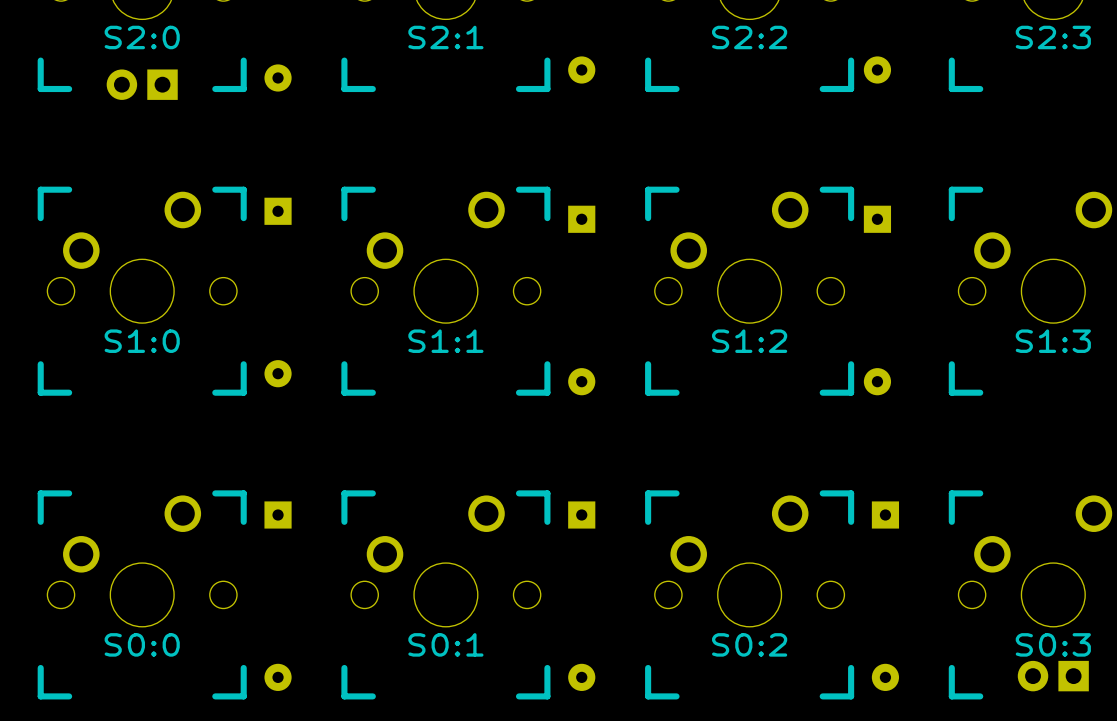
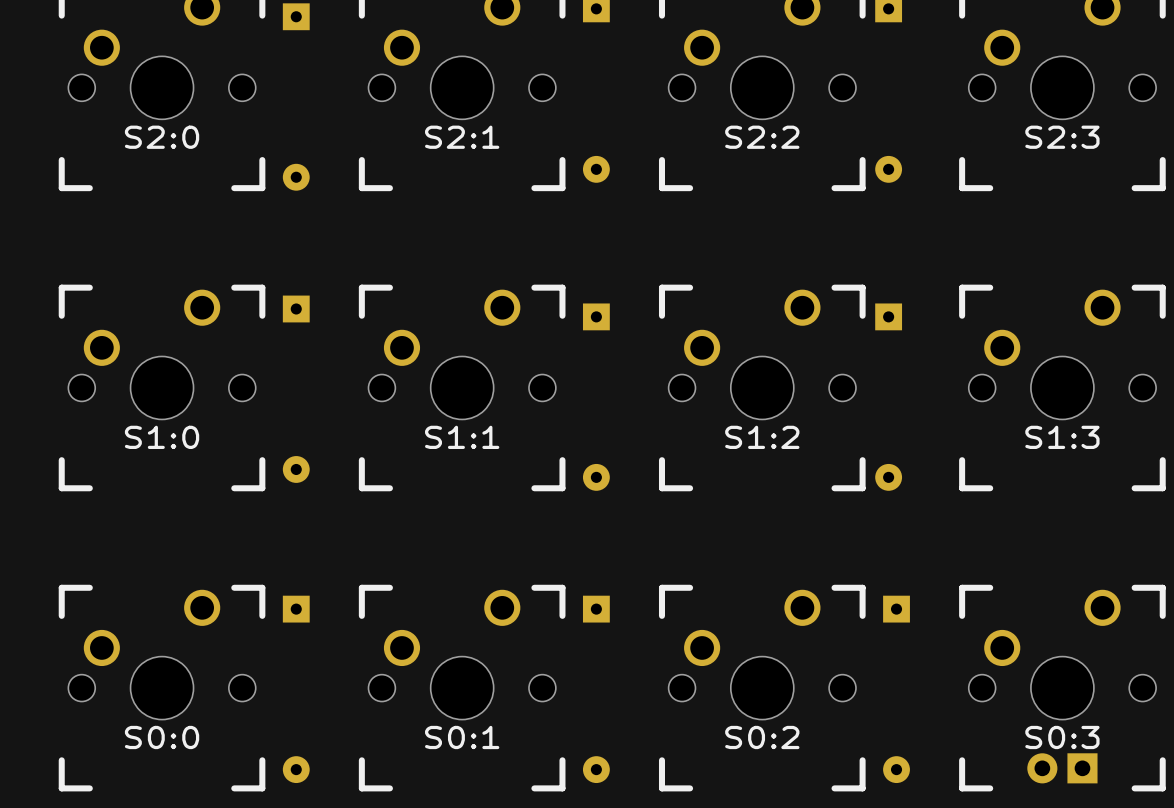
part: (142, 84) -> none

